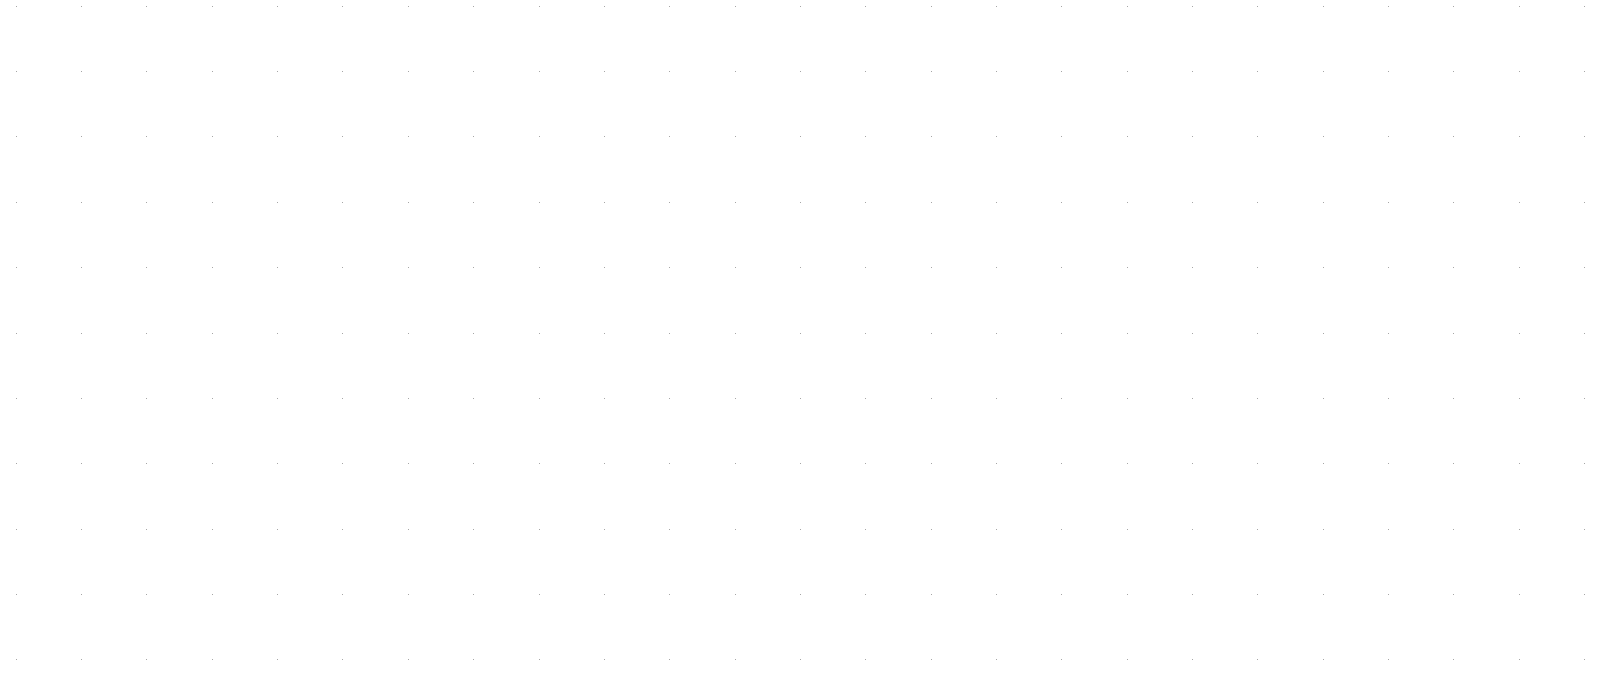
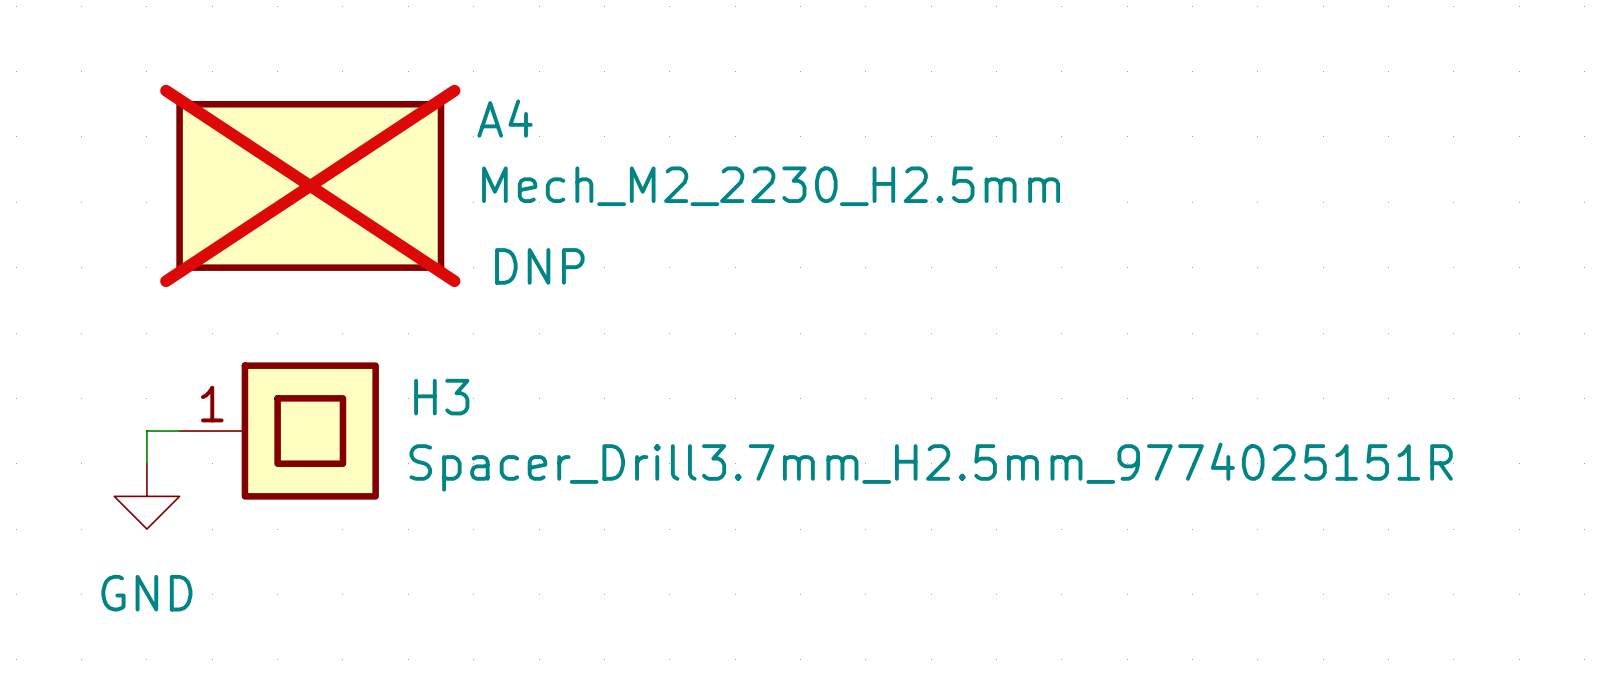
A4: none -> Mech_M2_2230_H2.5mm (310, 185)
wire: none -> (179, 431) (146, 431) (146, 463)
H3: none -> Spacer_Drill3.7mm_H2.5mm_9774025151R (279, 431)
power symbol: none -> GND (146, 496)

